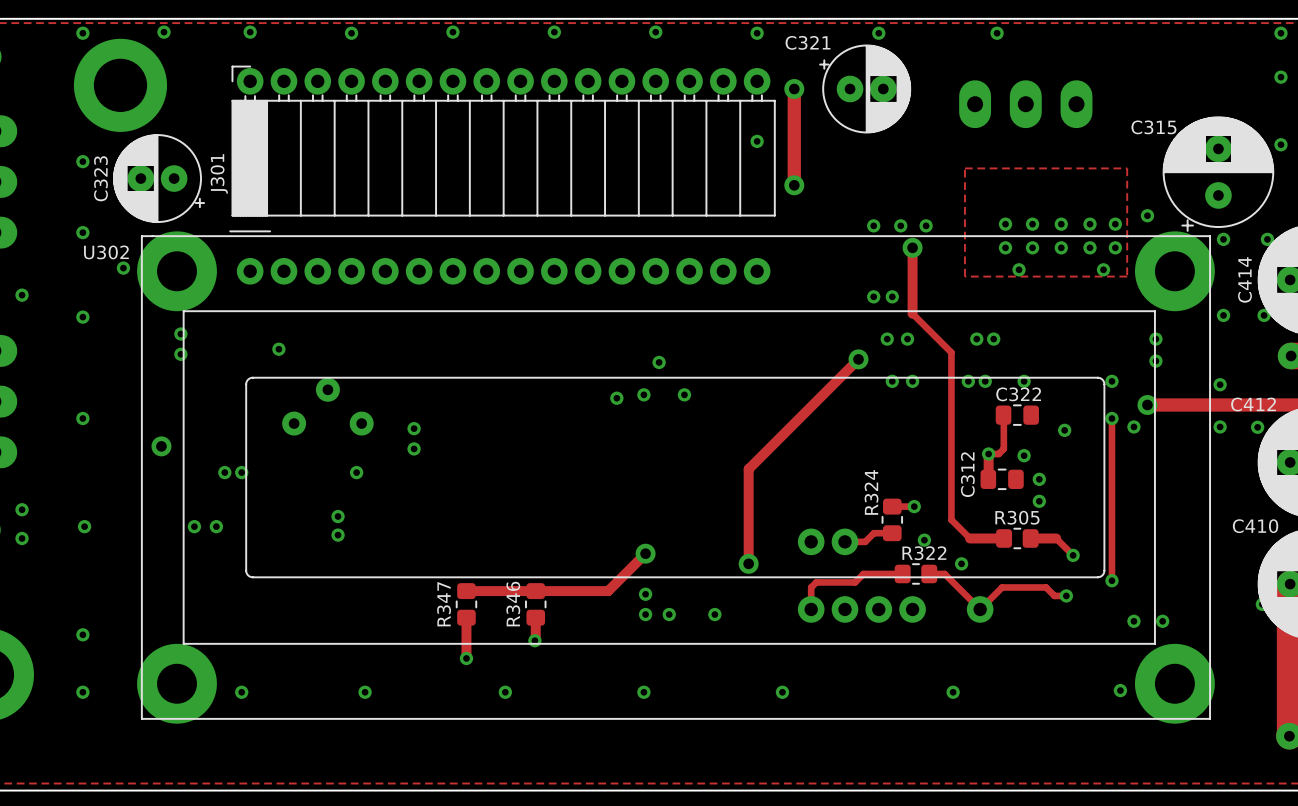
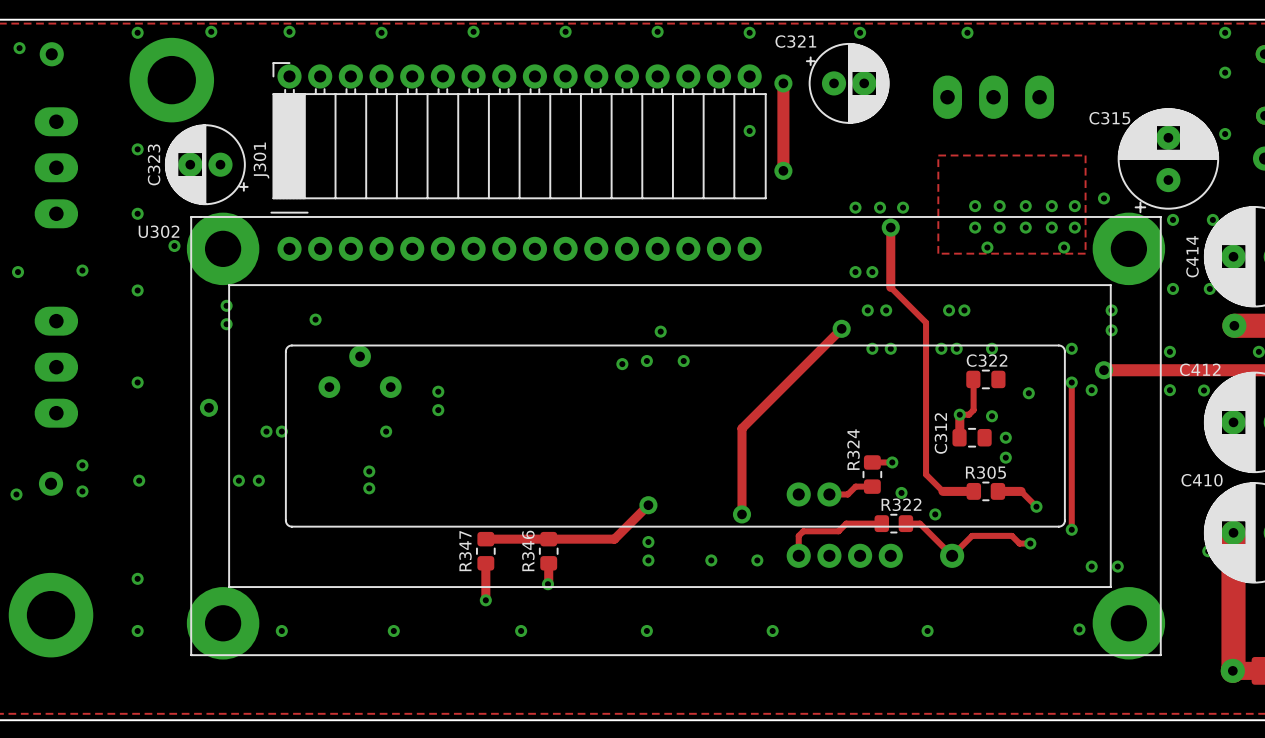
via: (669, 614) -> none
via: none -> (757, 560)

